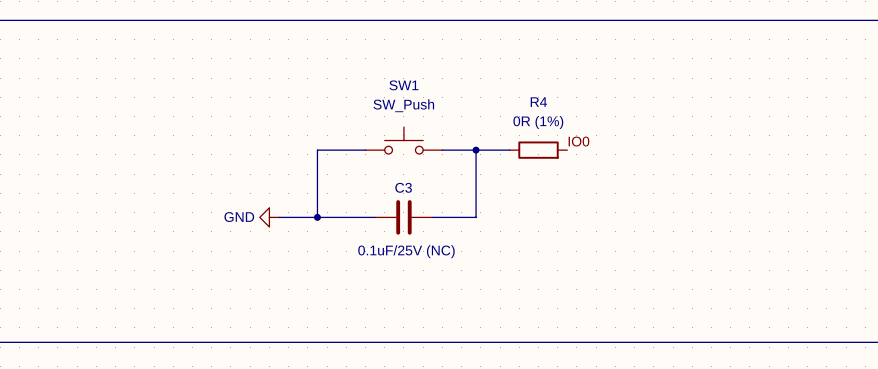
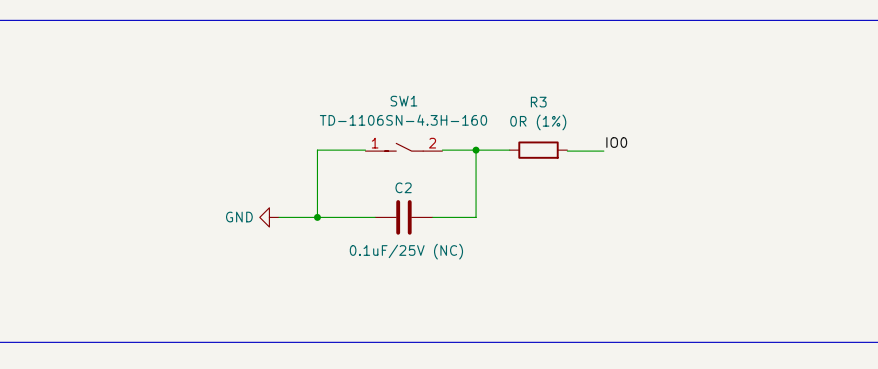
R4 name: R4 (538, 102) -> R3 (538, 102)
SW1 value: SW_Push (403, 105) -> TD-1106SN-4.3H-160 (403, 120)
SW1 symbol: [365, 127, 443, 154] -> [365, 142, 443, 152]
label position: IO0 (578, 141) -> IO0 (616, 142)
wire: none -> (567, 151) (603, 151)
C3 name: C3 (403, 187) -> C2 (403, 187)

